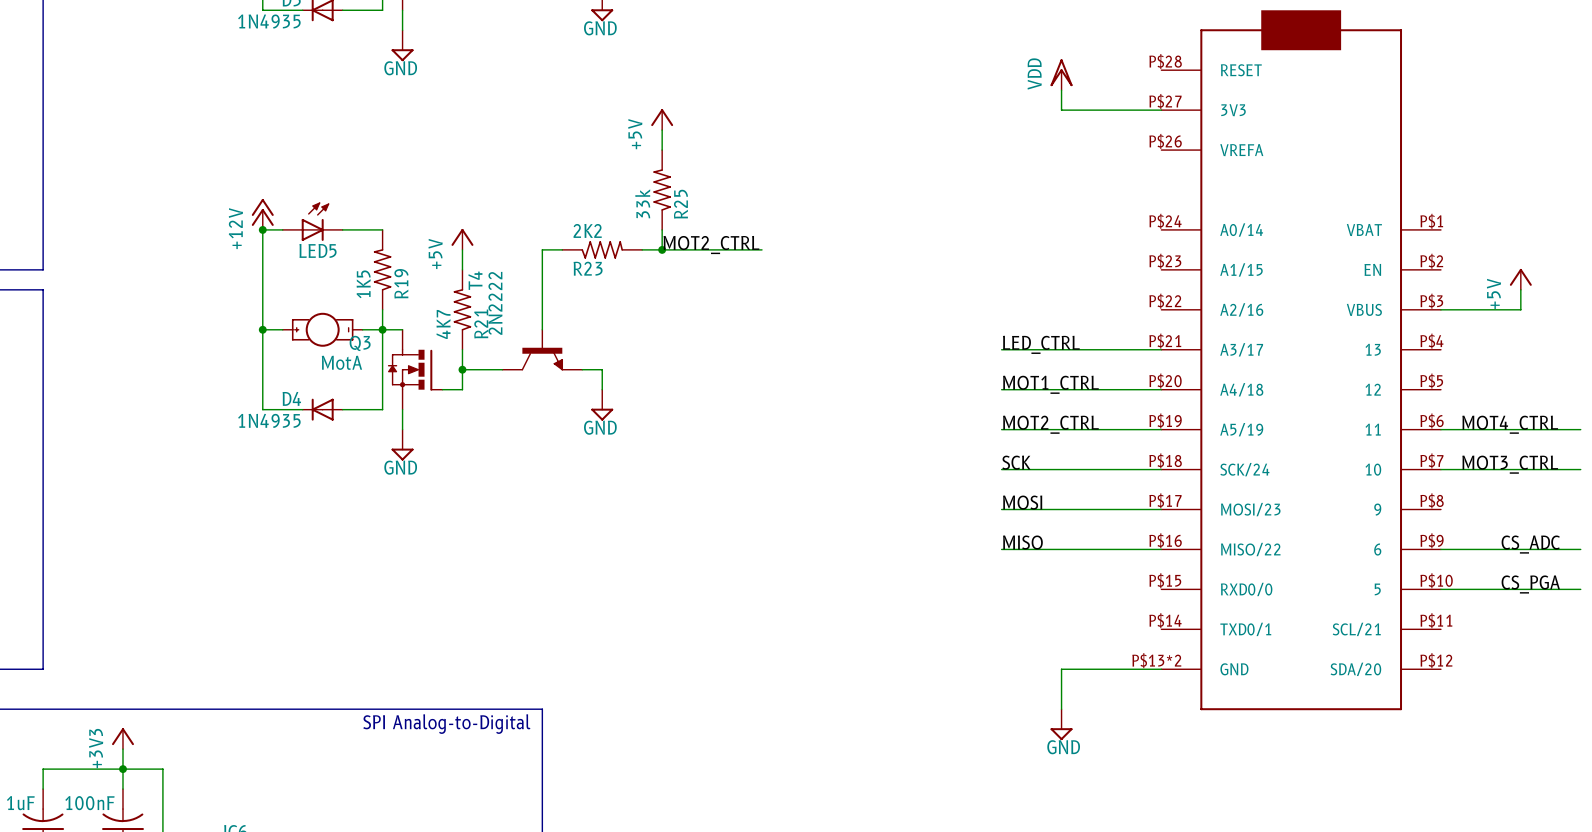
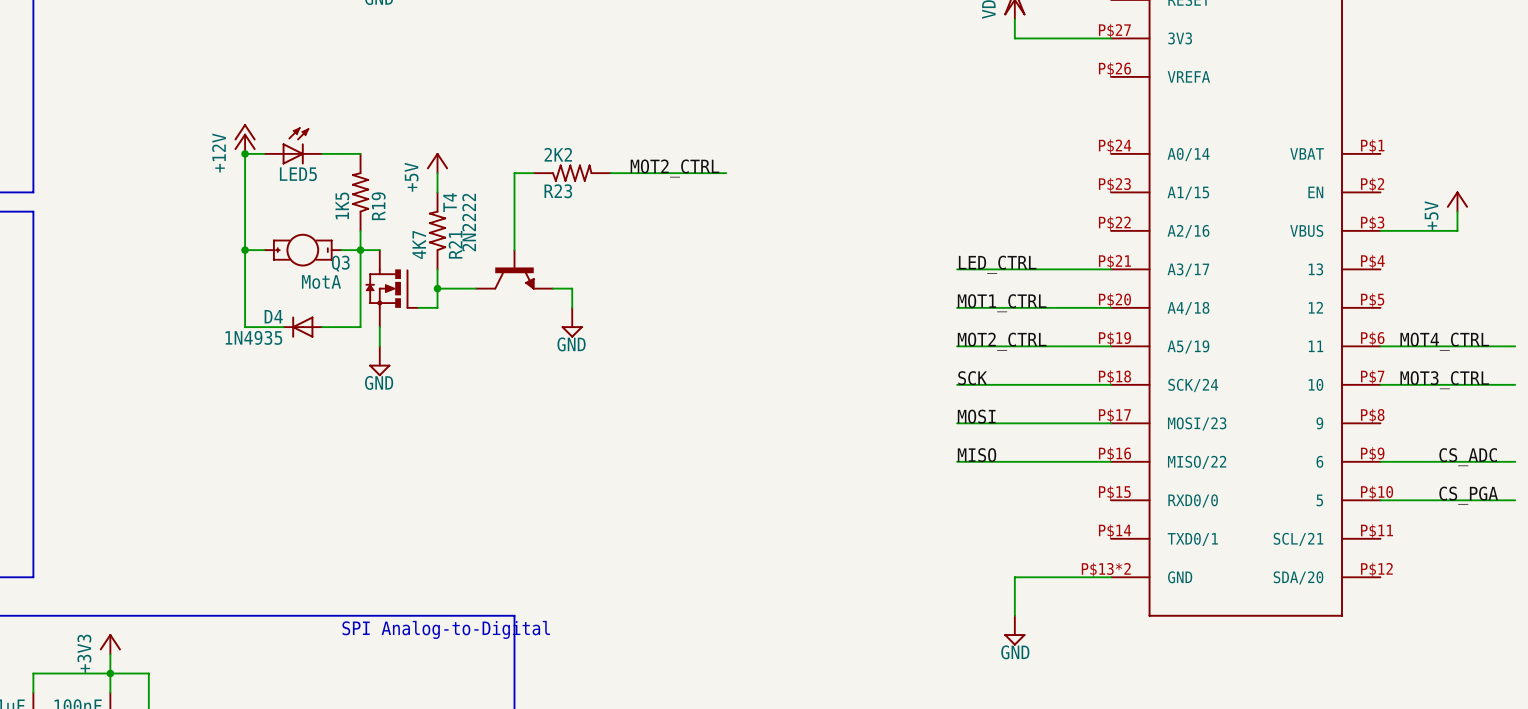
power symbol: +5V (662, 119) -> none
wire: (662, 130) (662, 150) -> none
R25: 33k (662, 190) -> none
wire: (662, 229) (662, 249) -> none
junction: (662, 249) -> none

